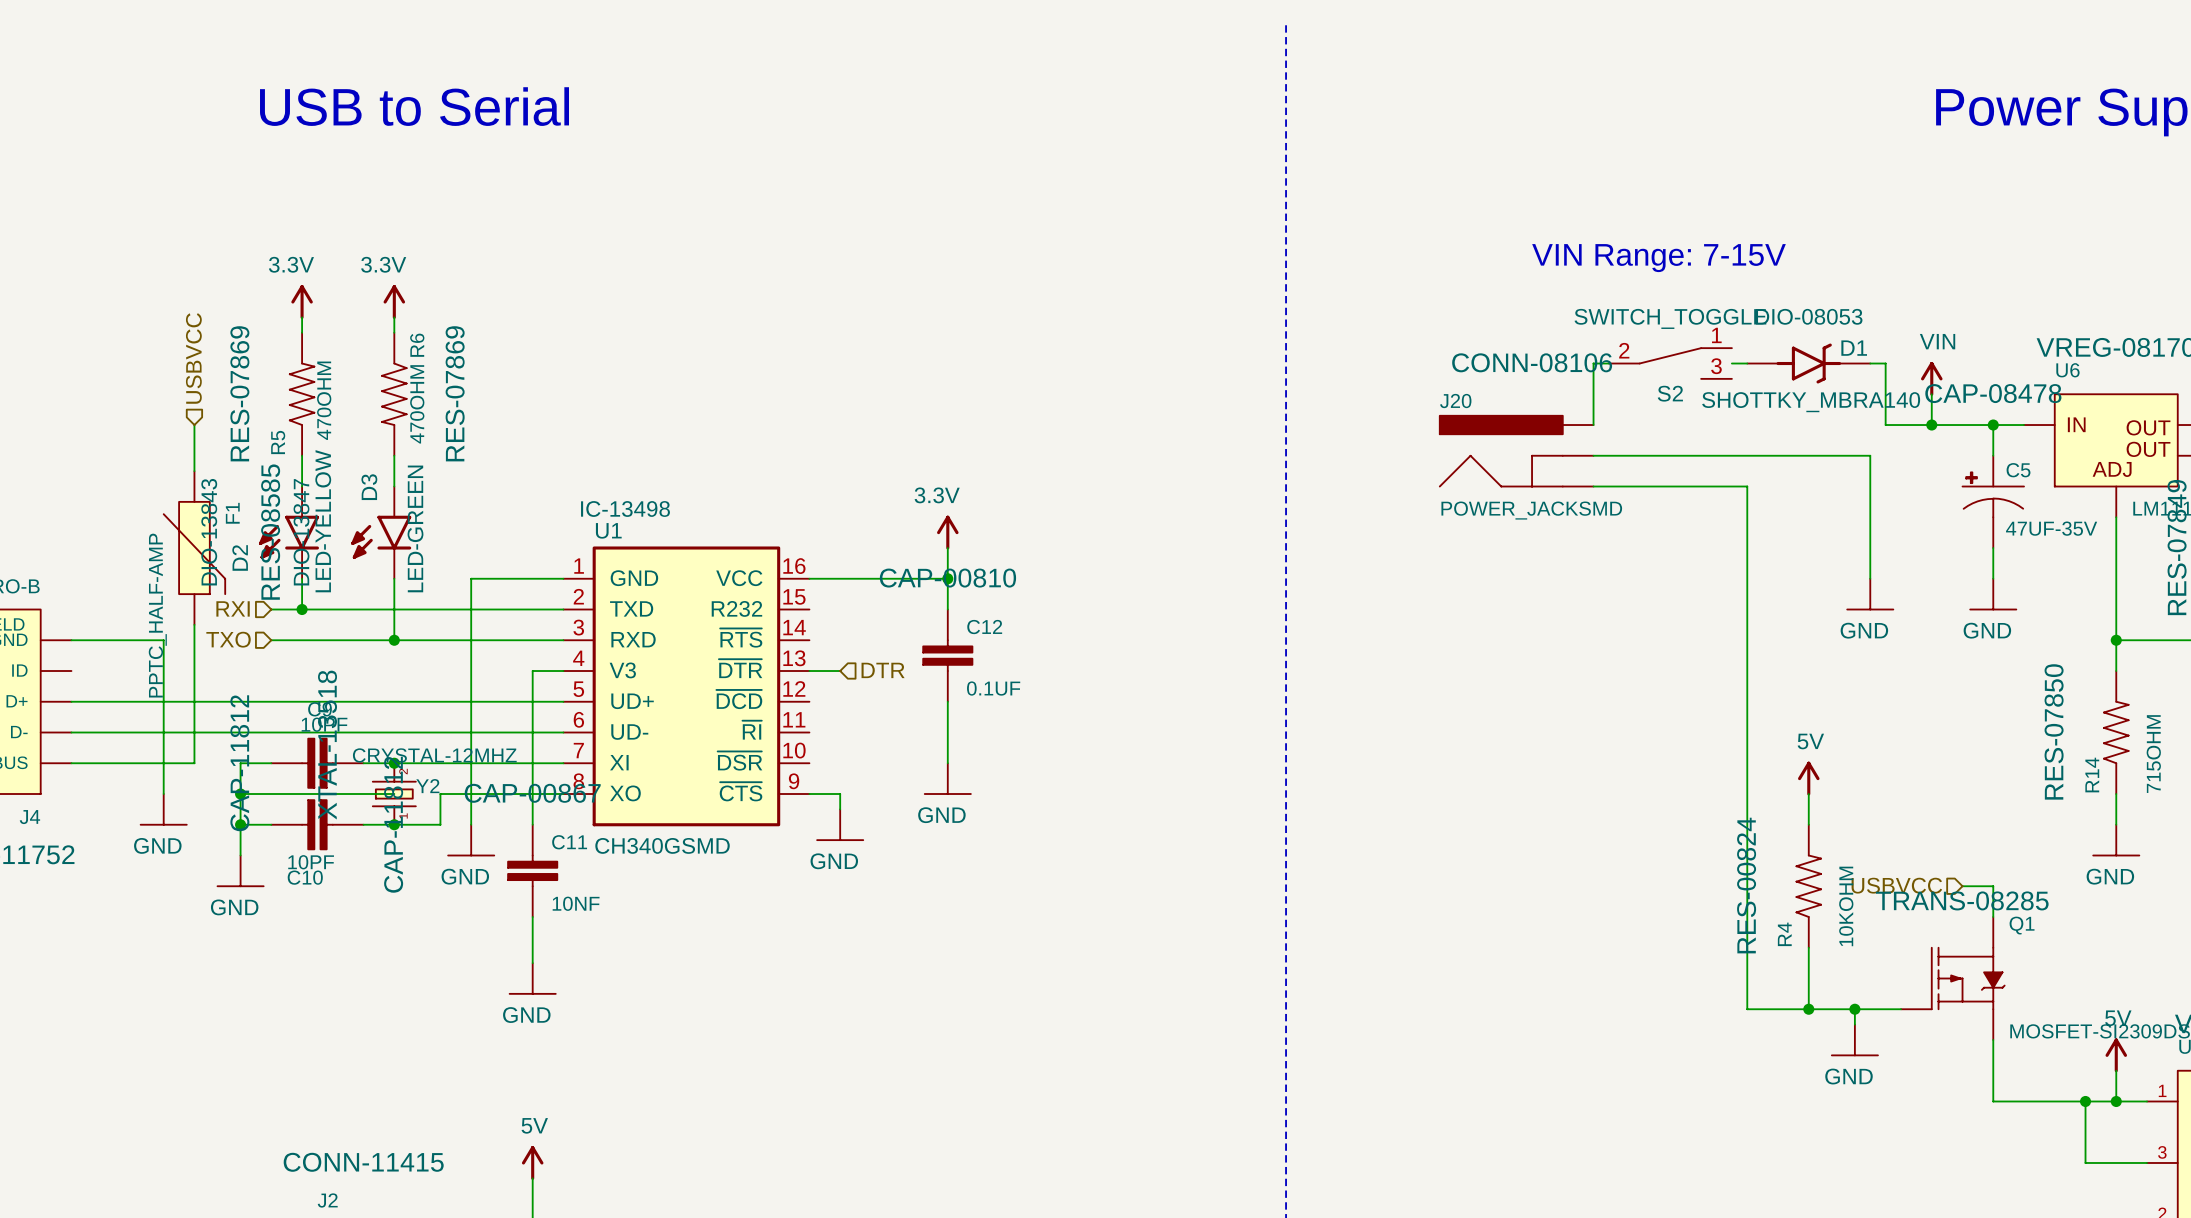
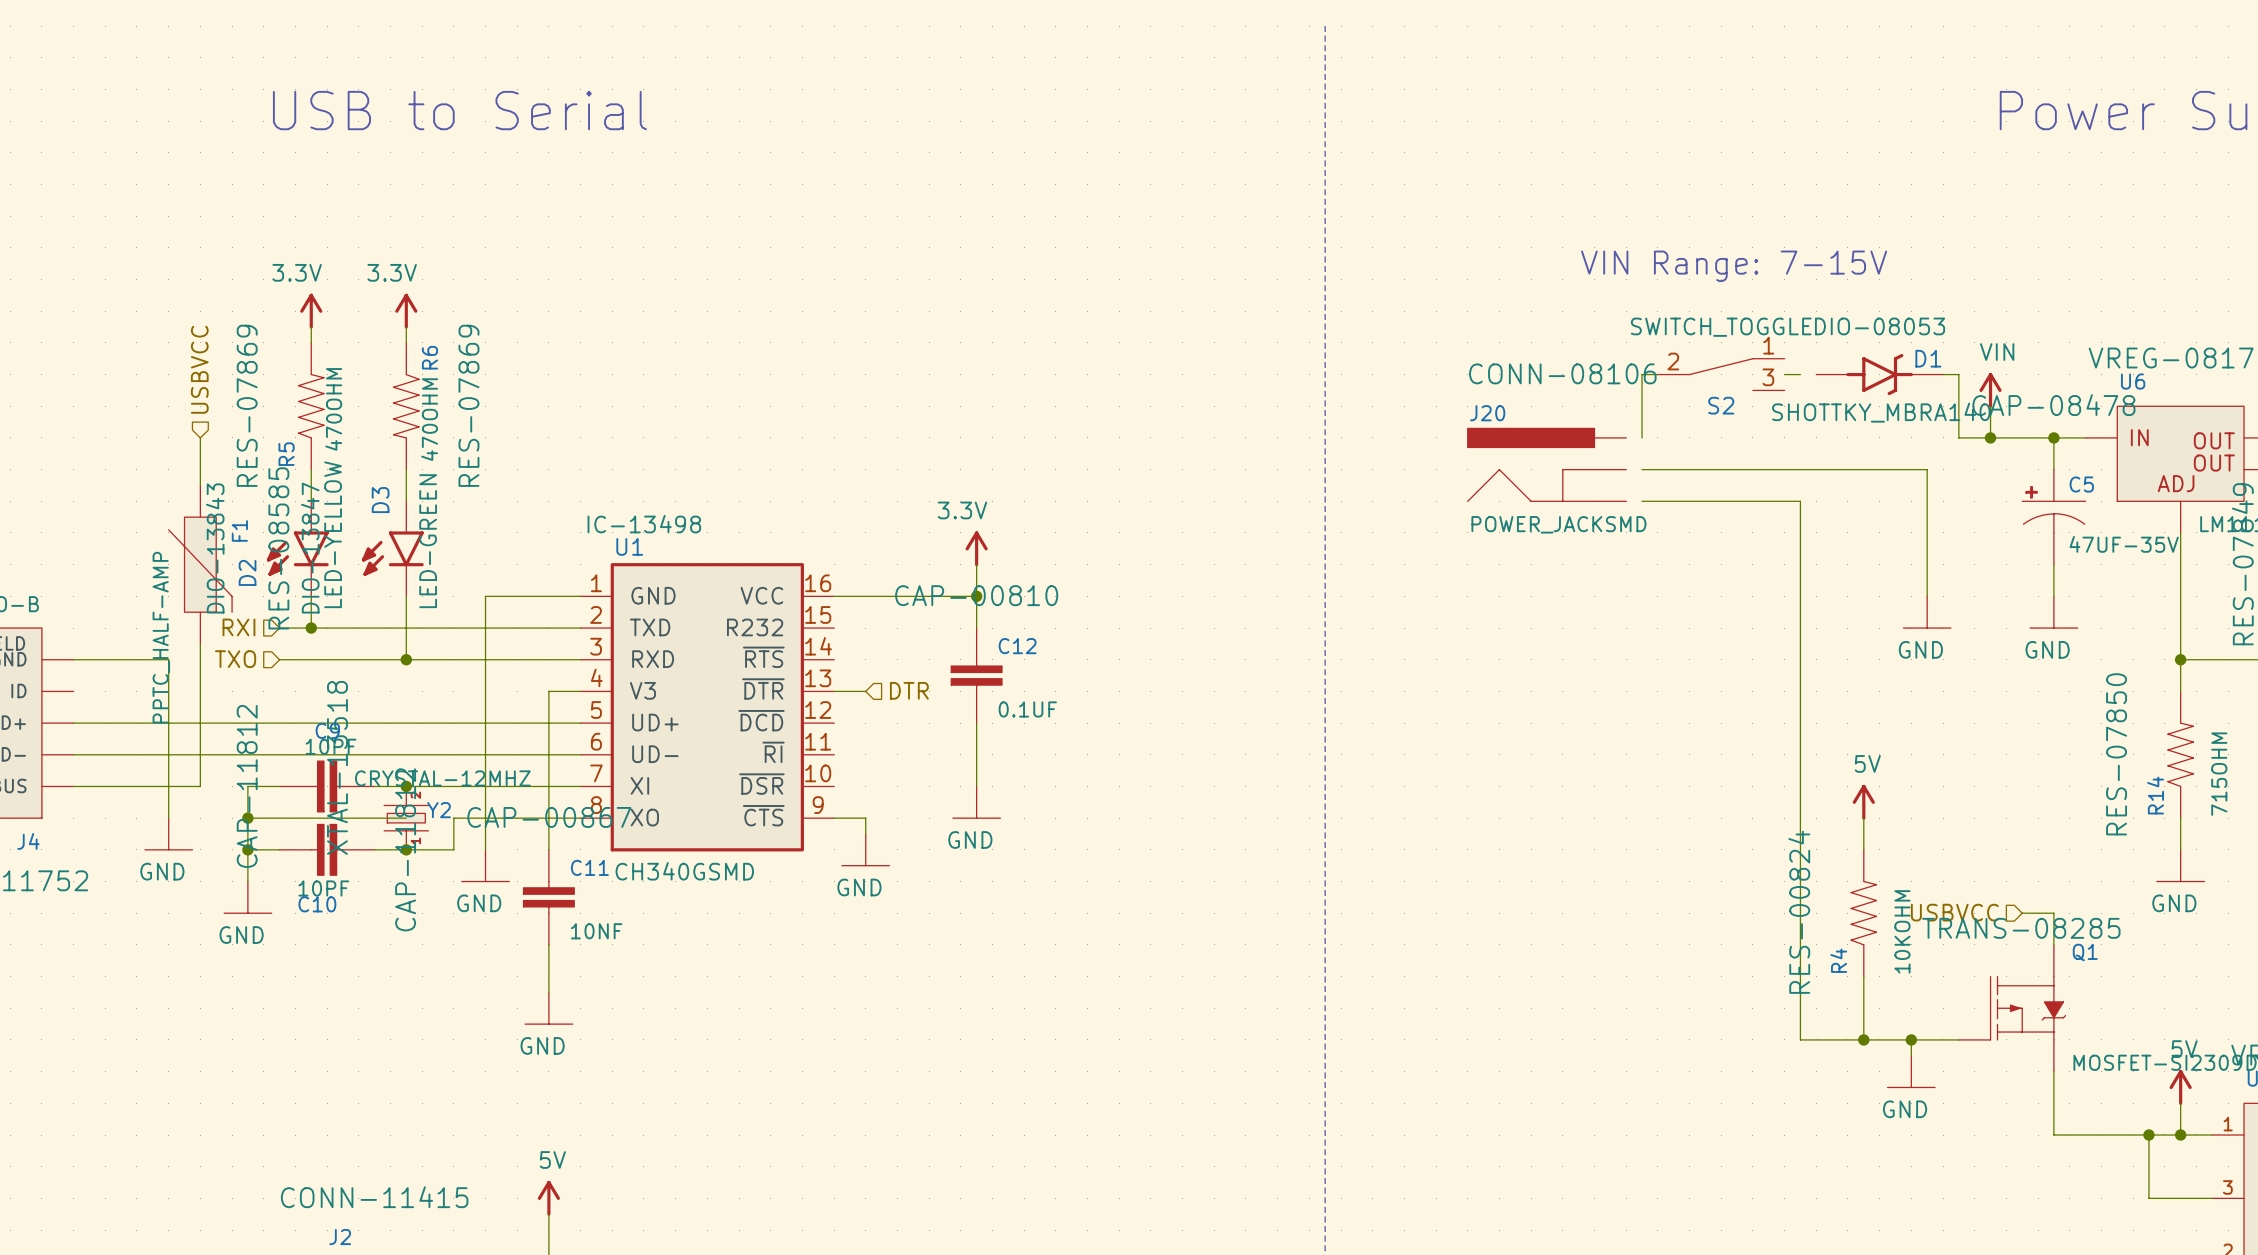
D1 position: (1808, 363) -> (1879, 374)
wire: (1870, 363) (1885, 363) (1885, 425) (1901, 425) -> (1943, 374) (1958, 374) (1958, 437)
J20 position: (1516, 451) -> (1546, 464)

